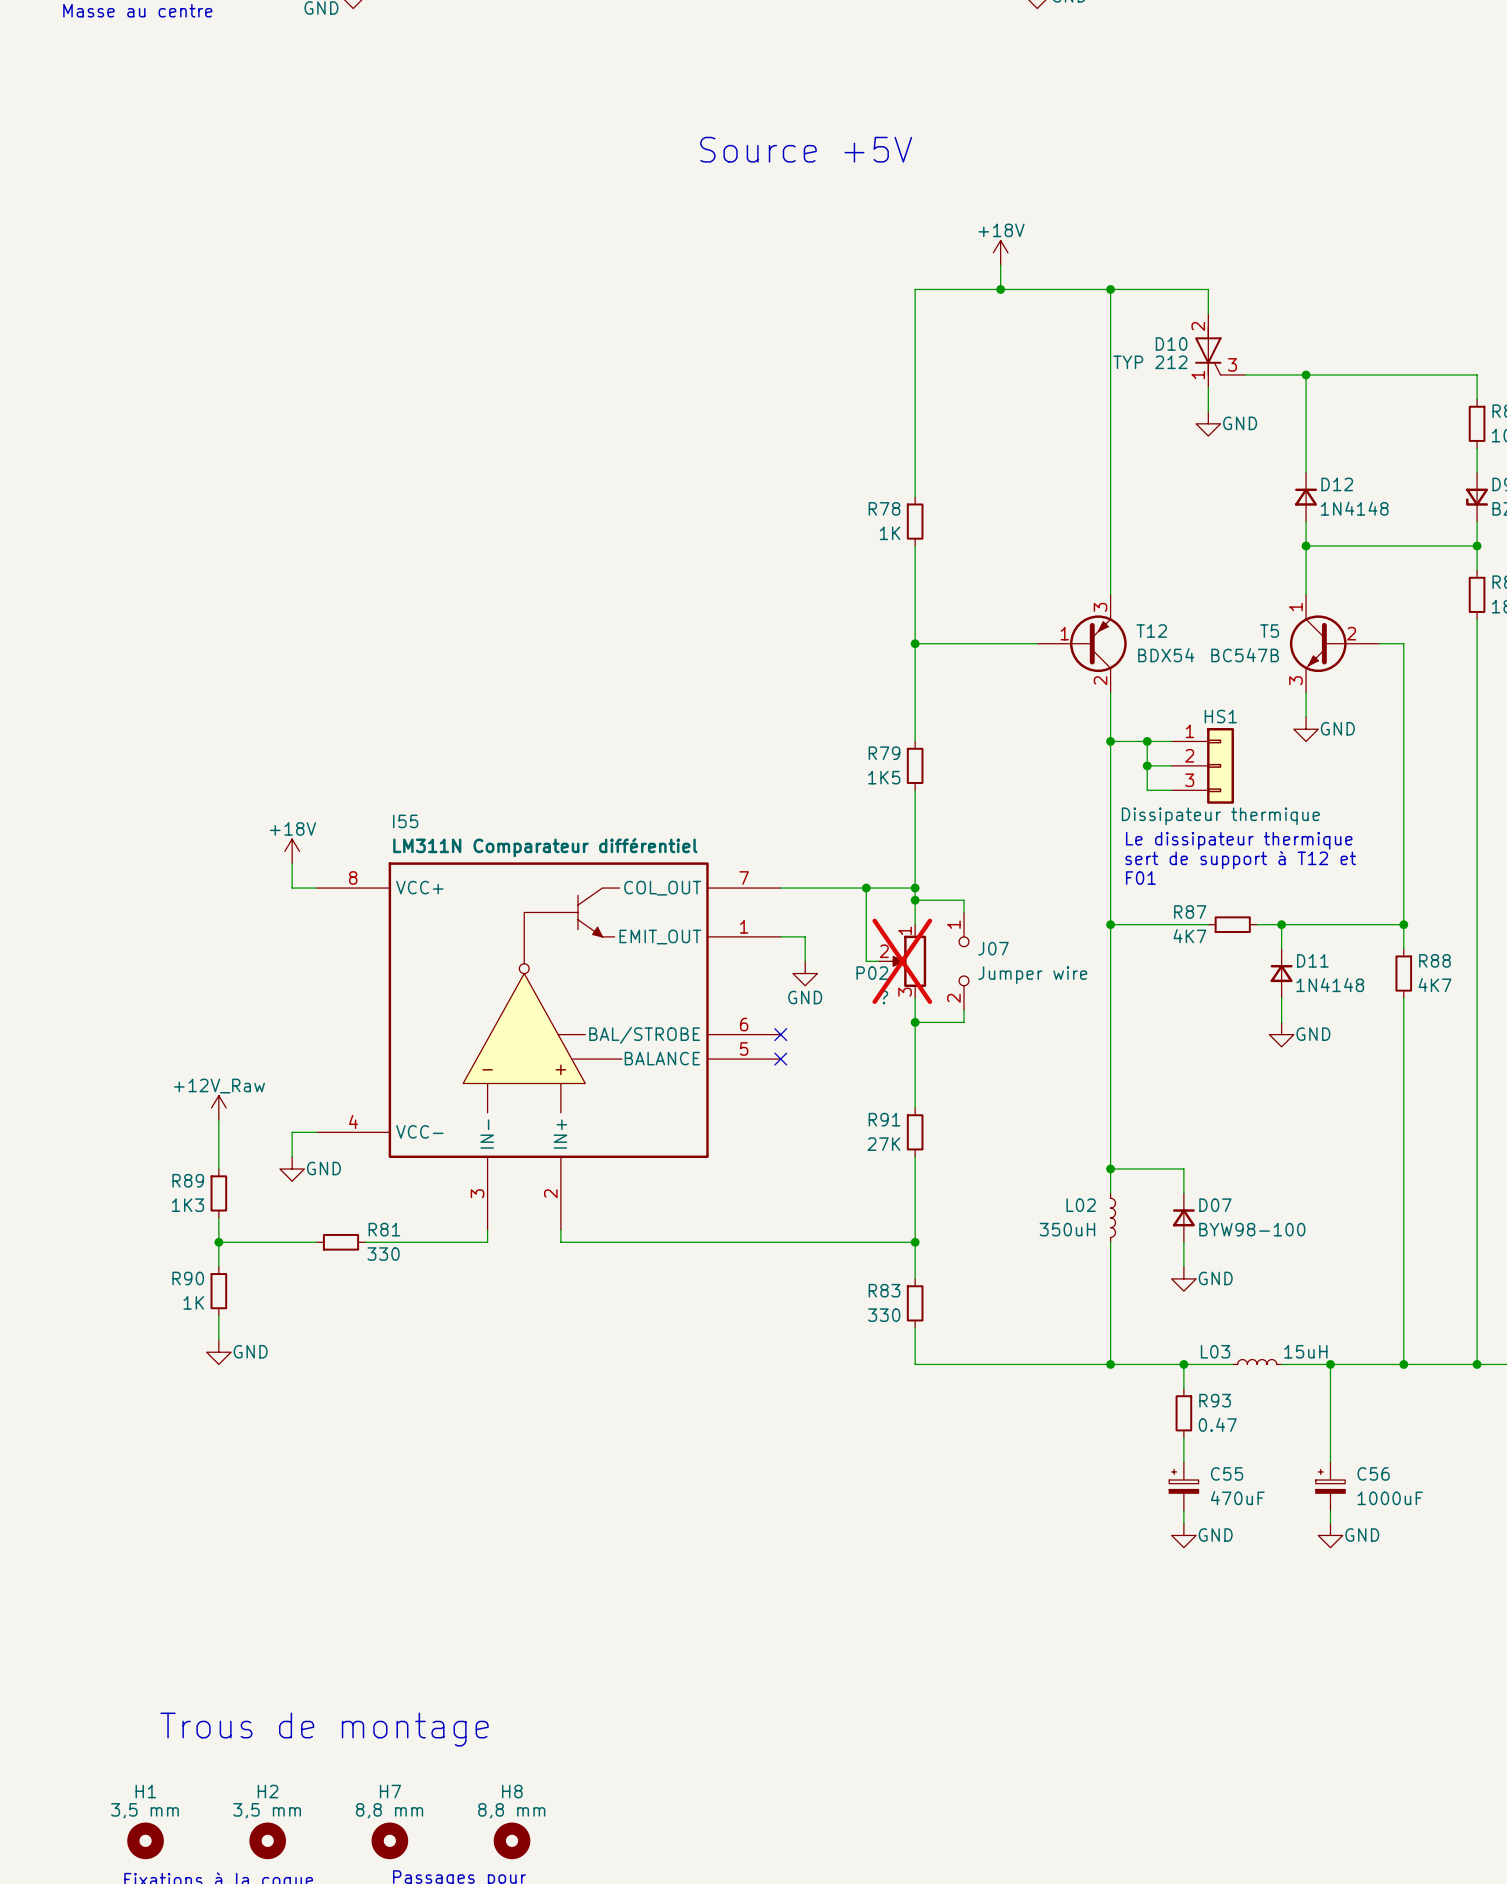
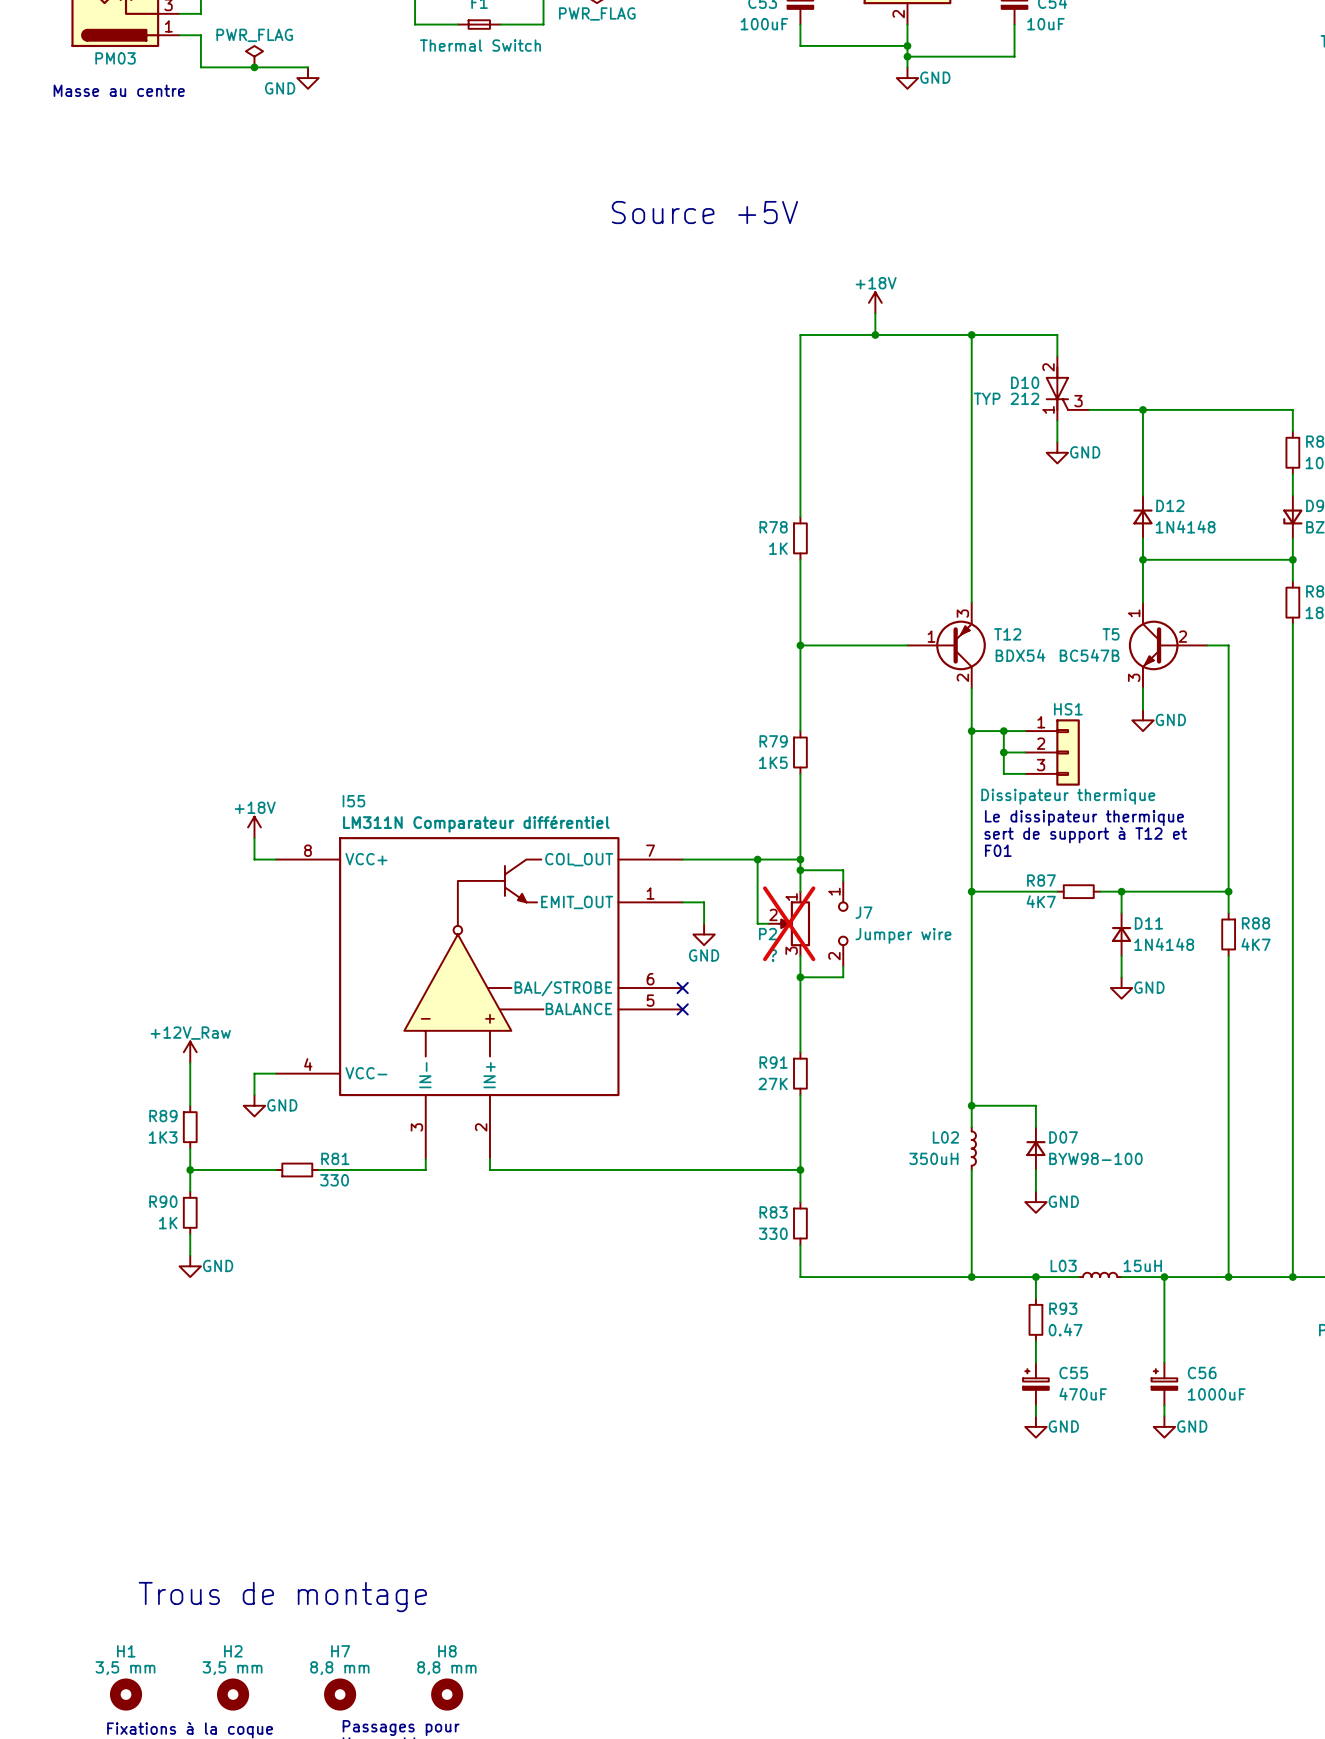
J07 name: J07 (993, 948) -> J7 (863, 912)
P02 name: P02 (872, 973) -> P2 (767, 934)

